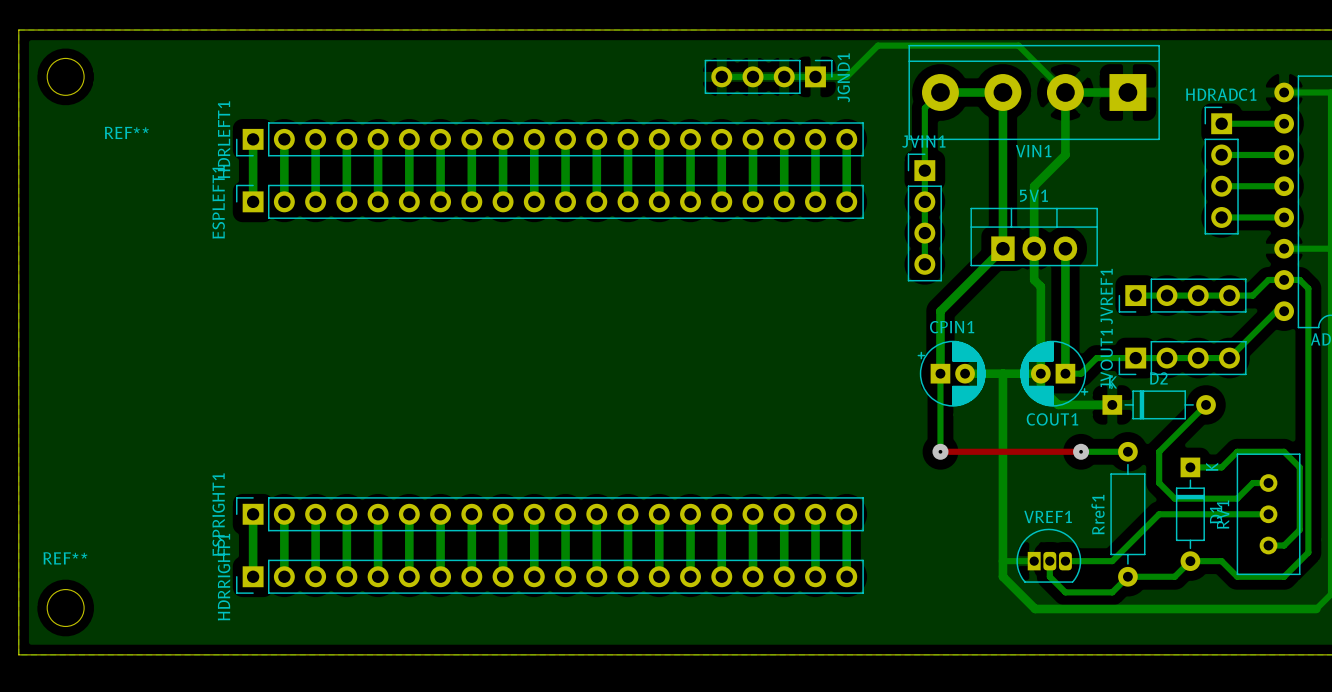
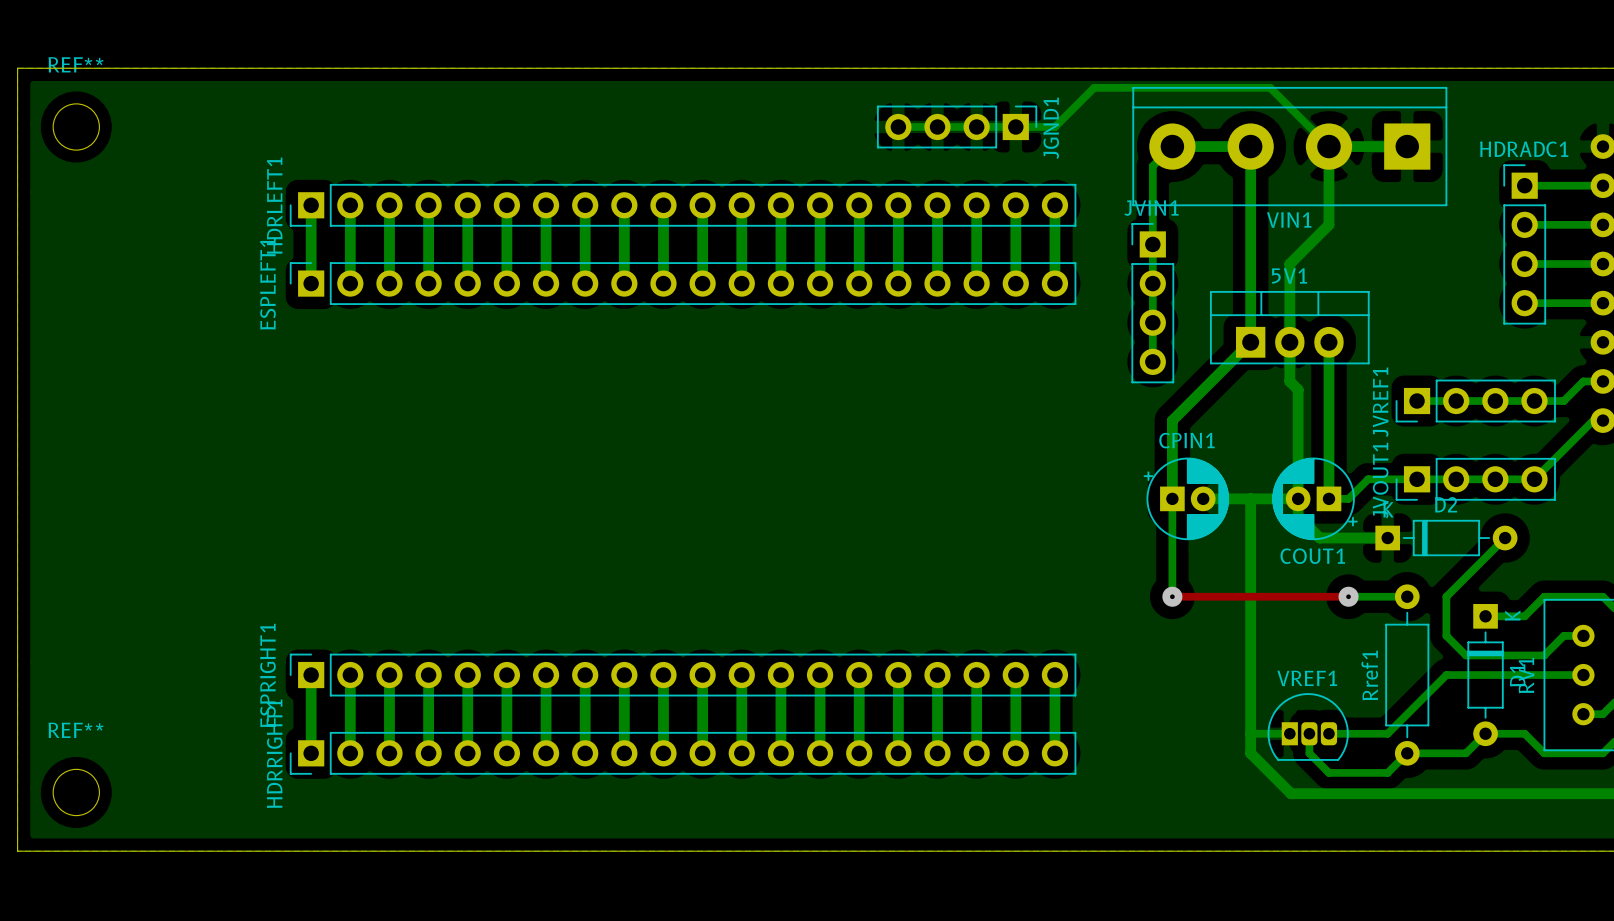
REF** name position: REF** (126, 132) -> REF** (76, 64)

